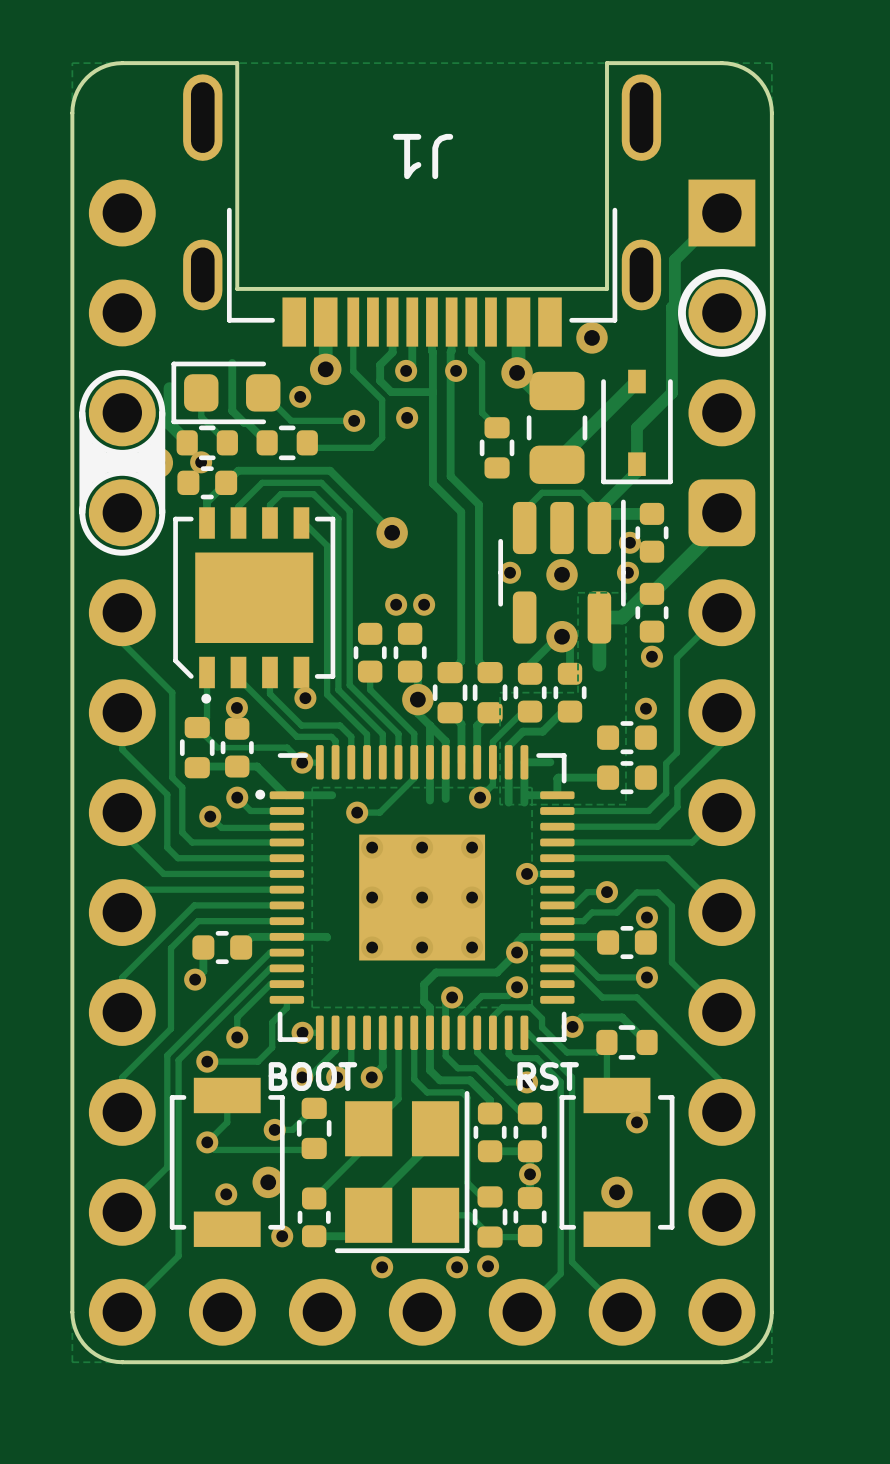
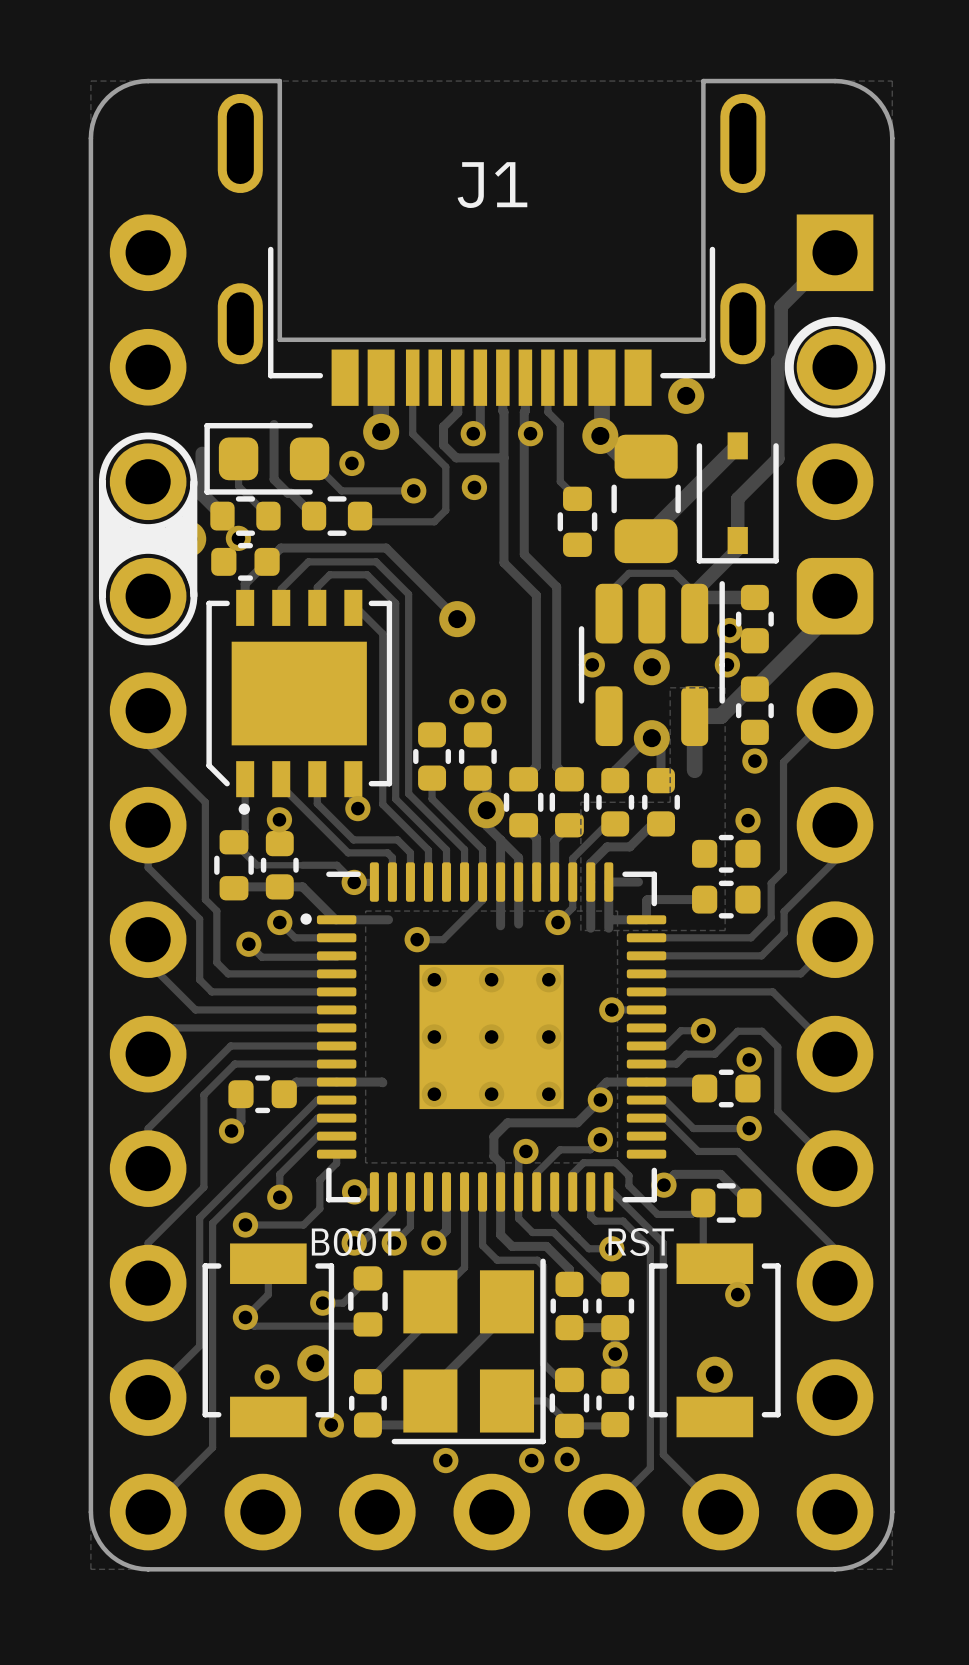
J1 name rotation: 0° (423, 156) -> 180° (492, 185)

